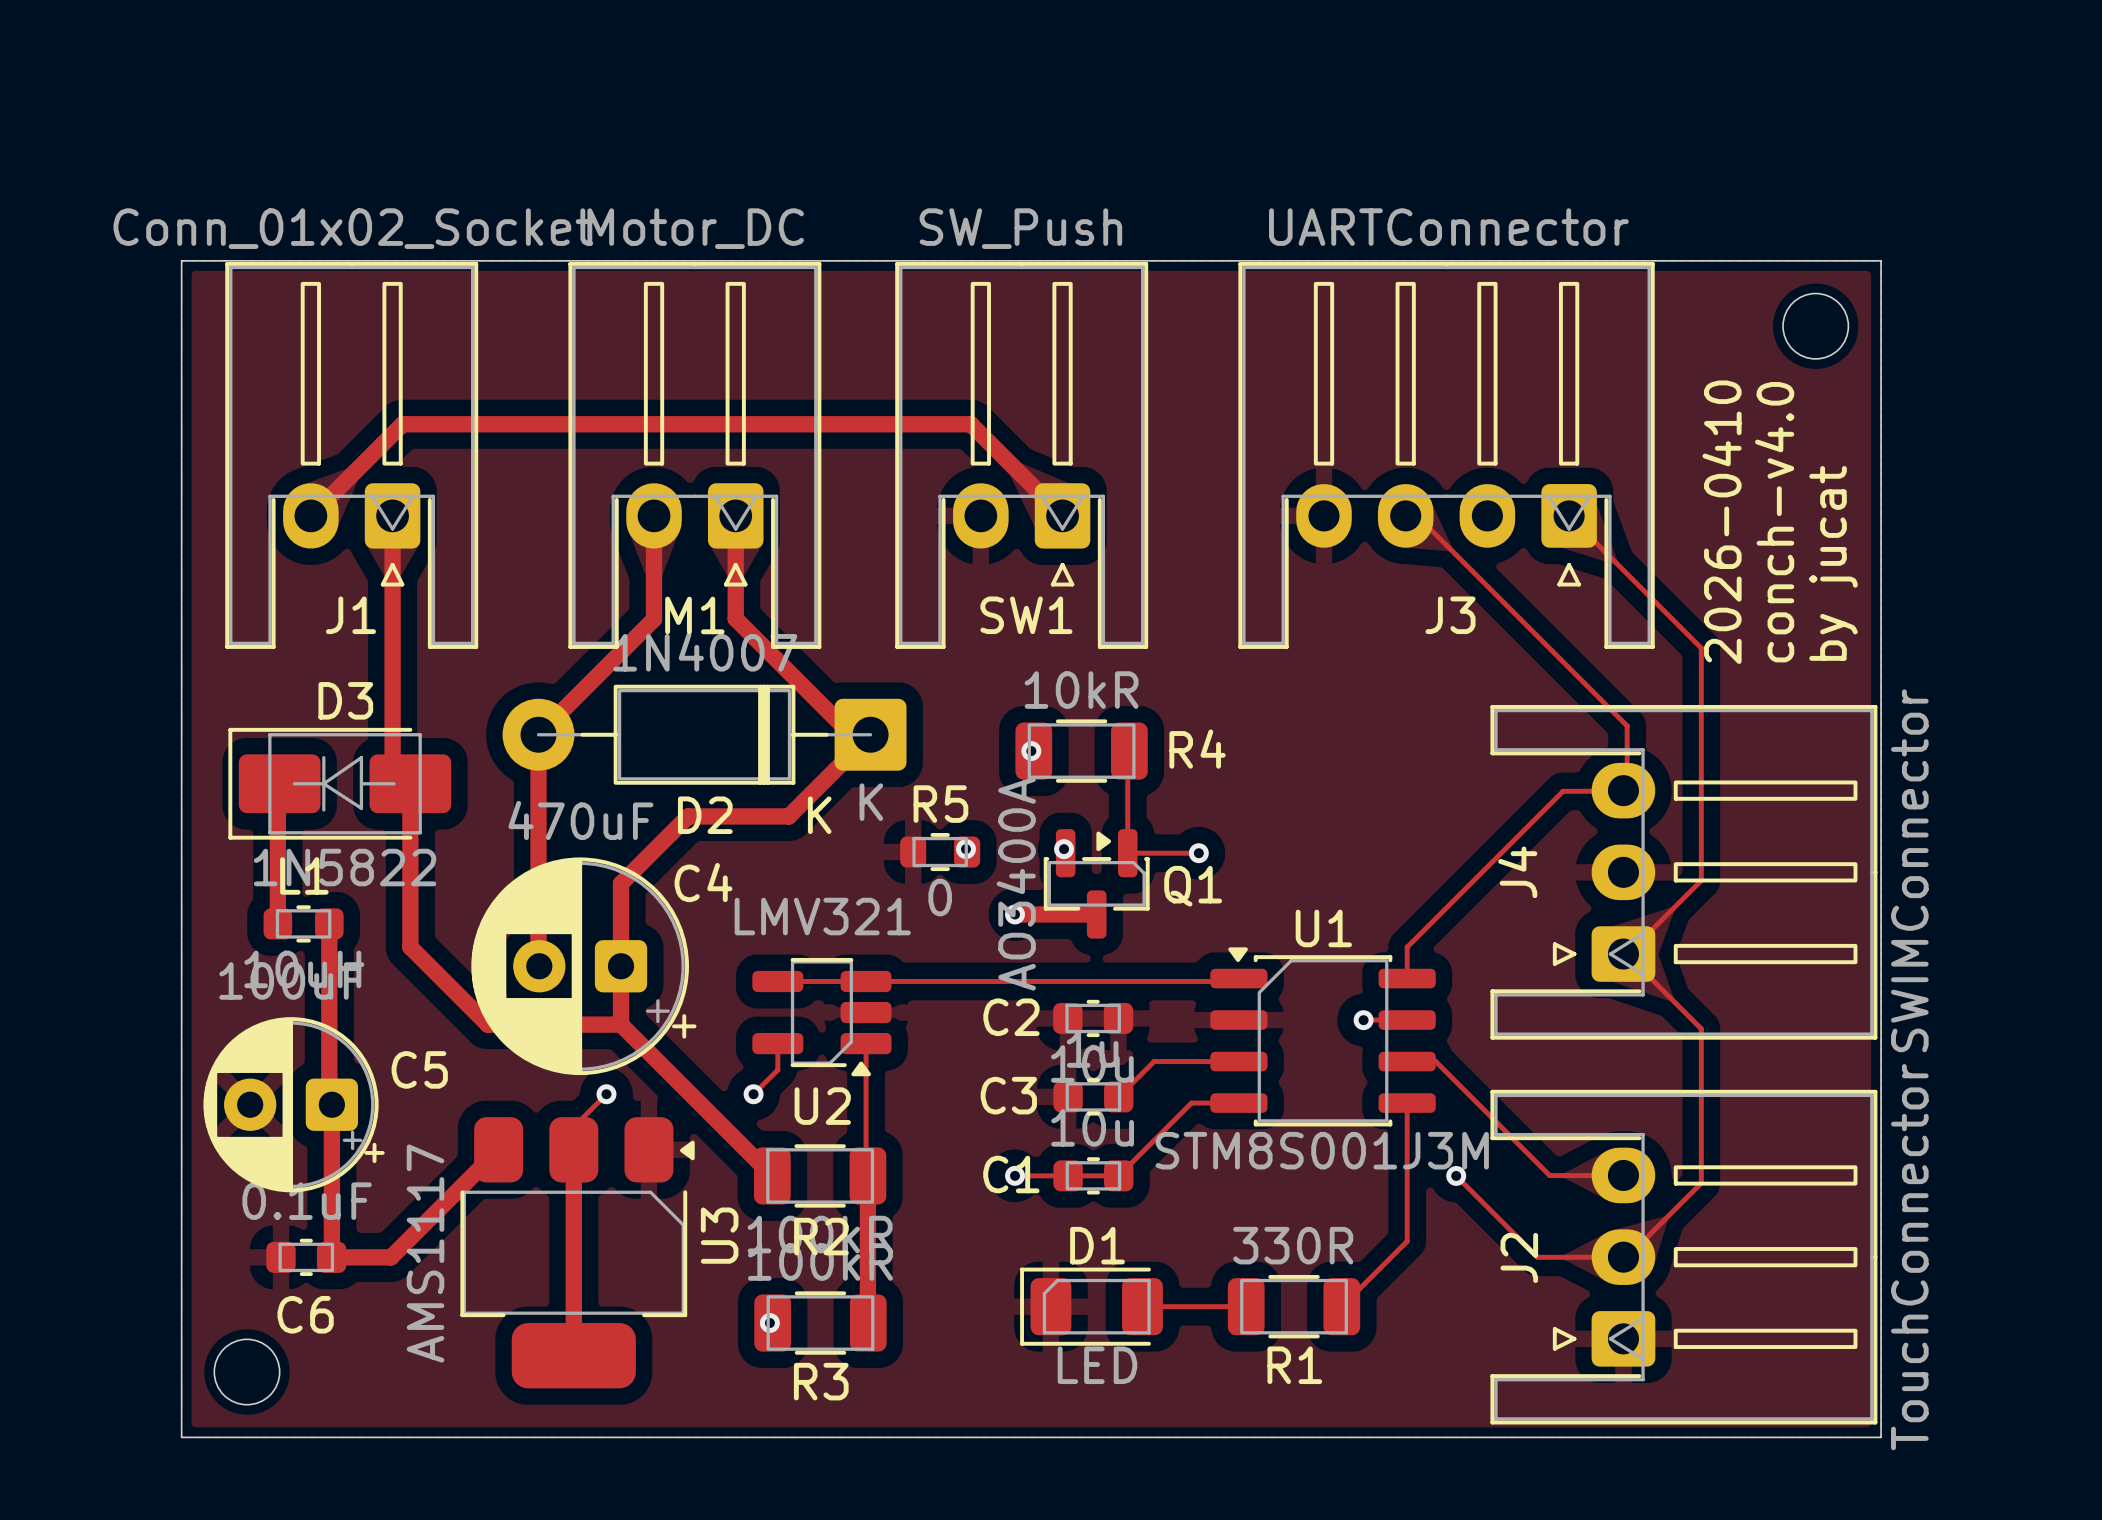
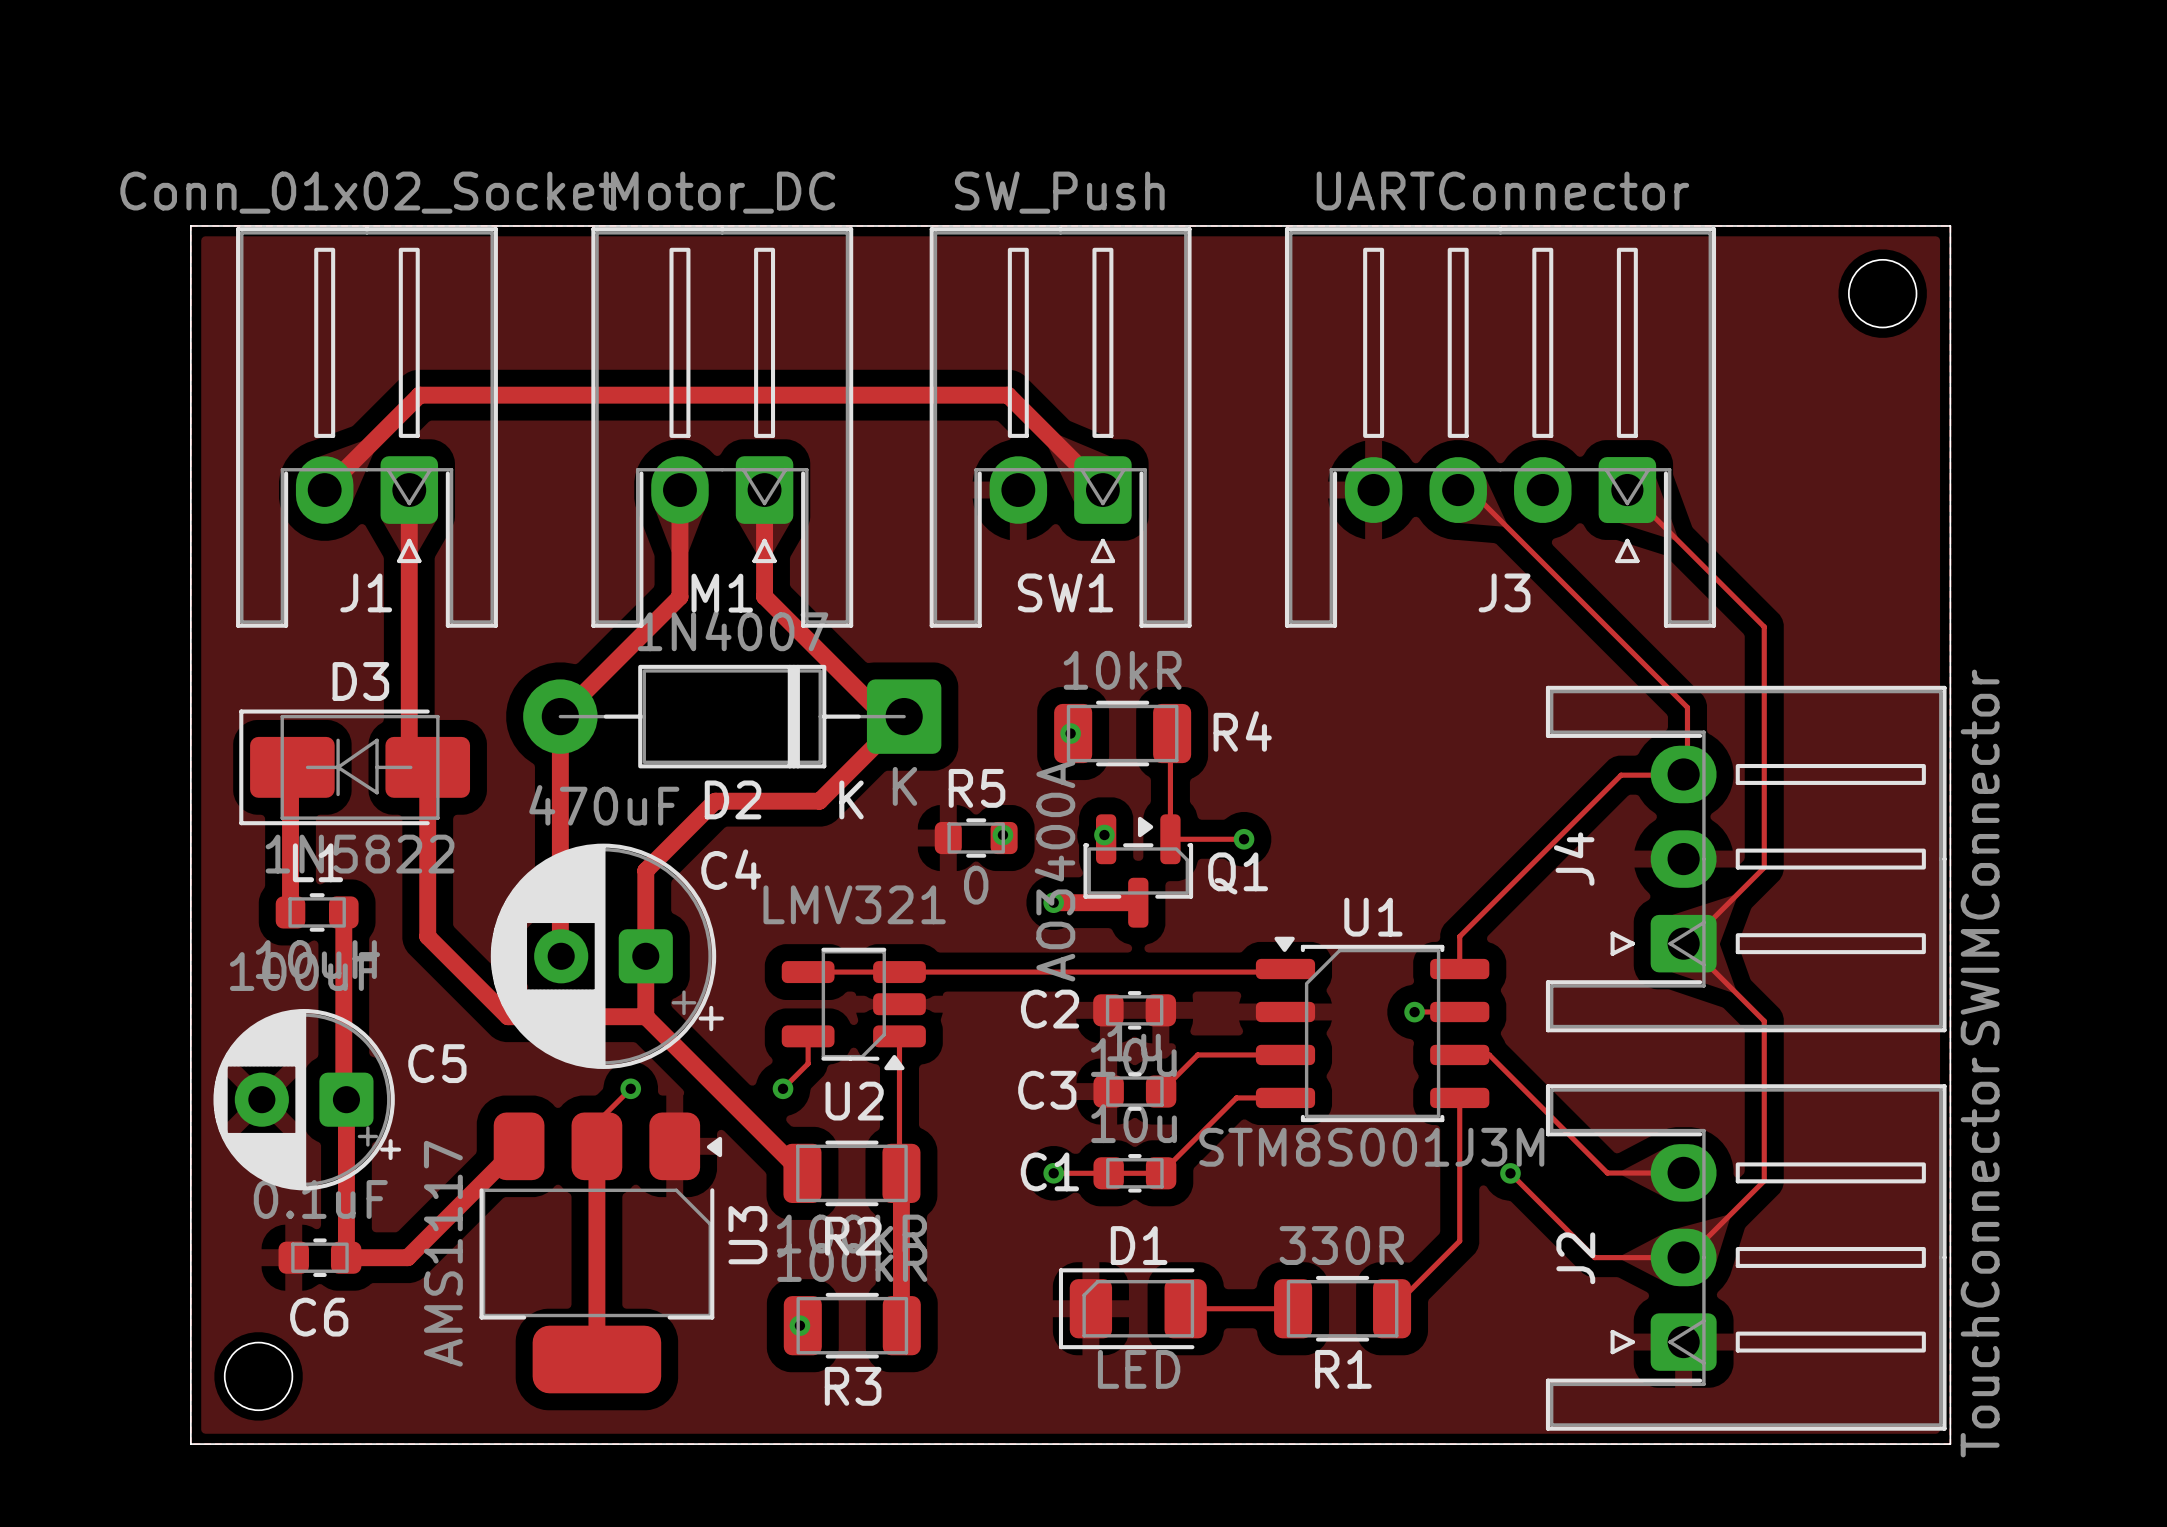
text: 2026-0410 (1722, 522) -> none
text: conch-v4.0 (1774, 522) -> none
text: by jucat (1833, 563) -> none

